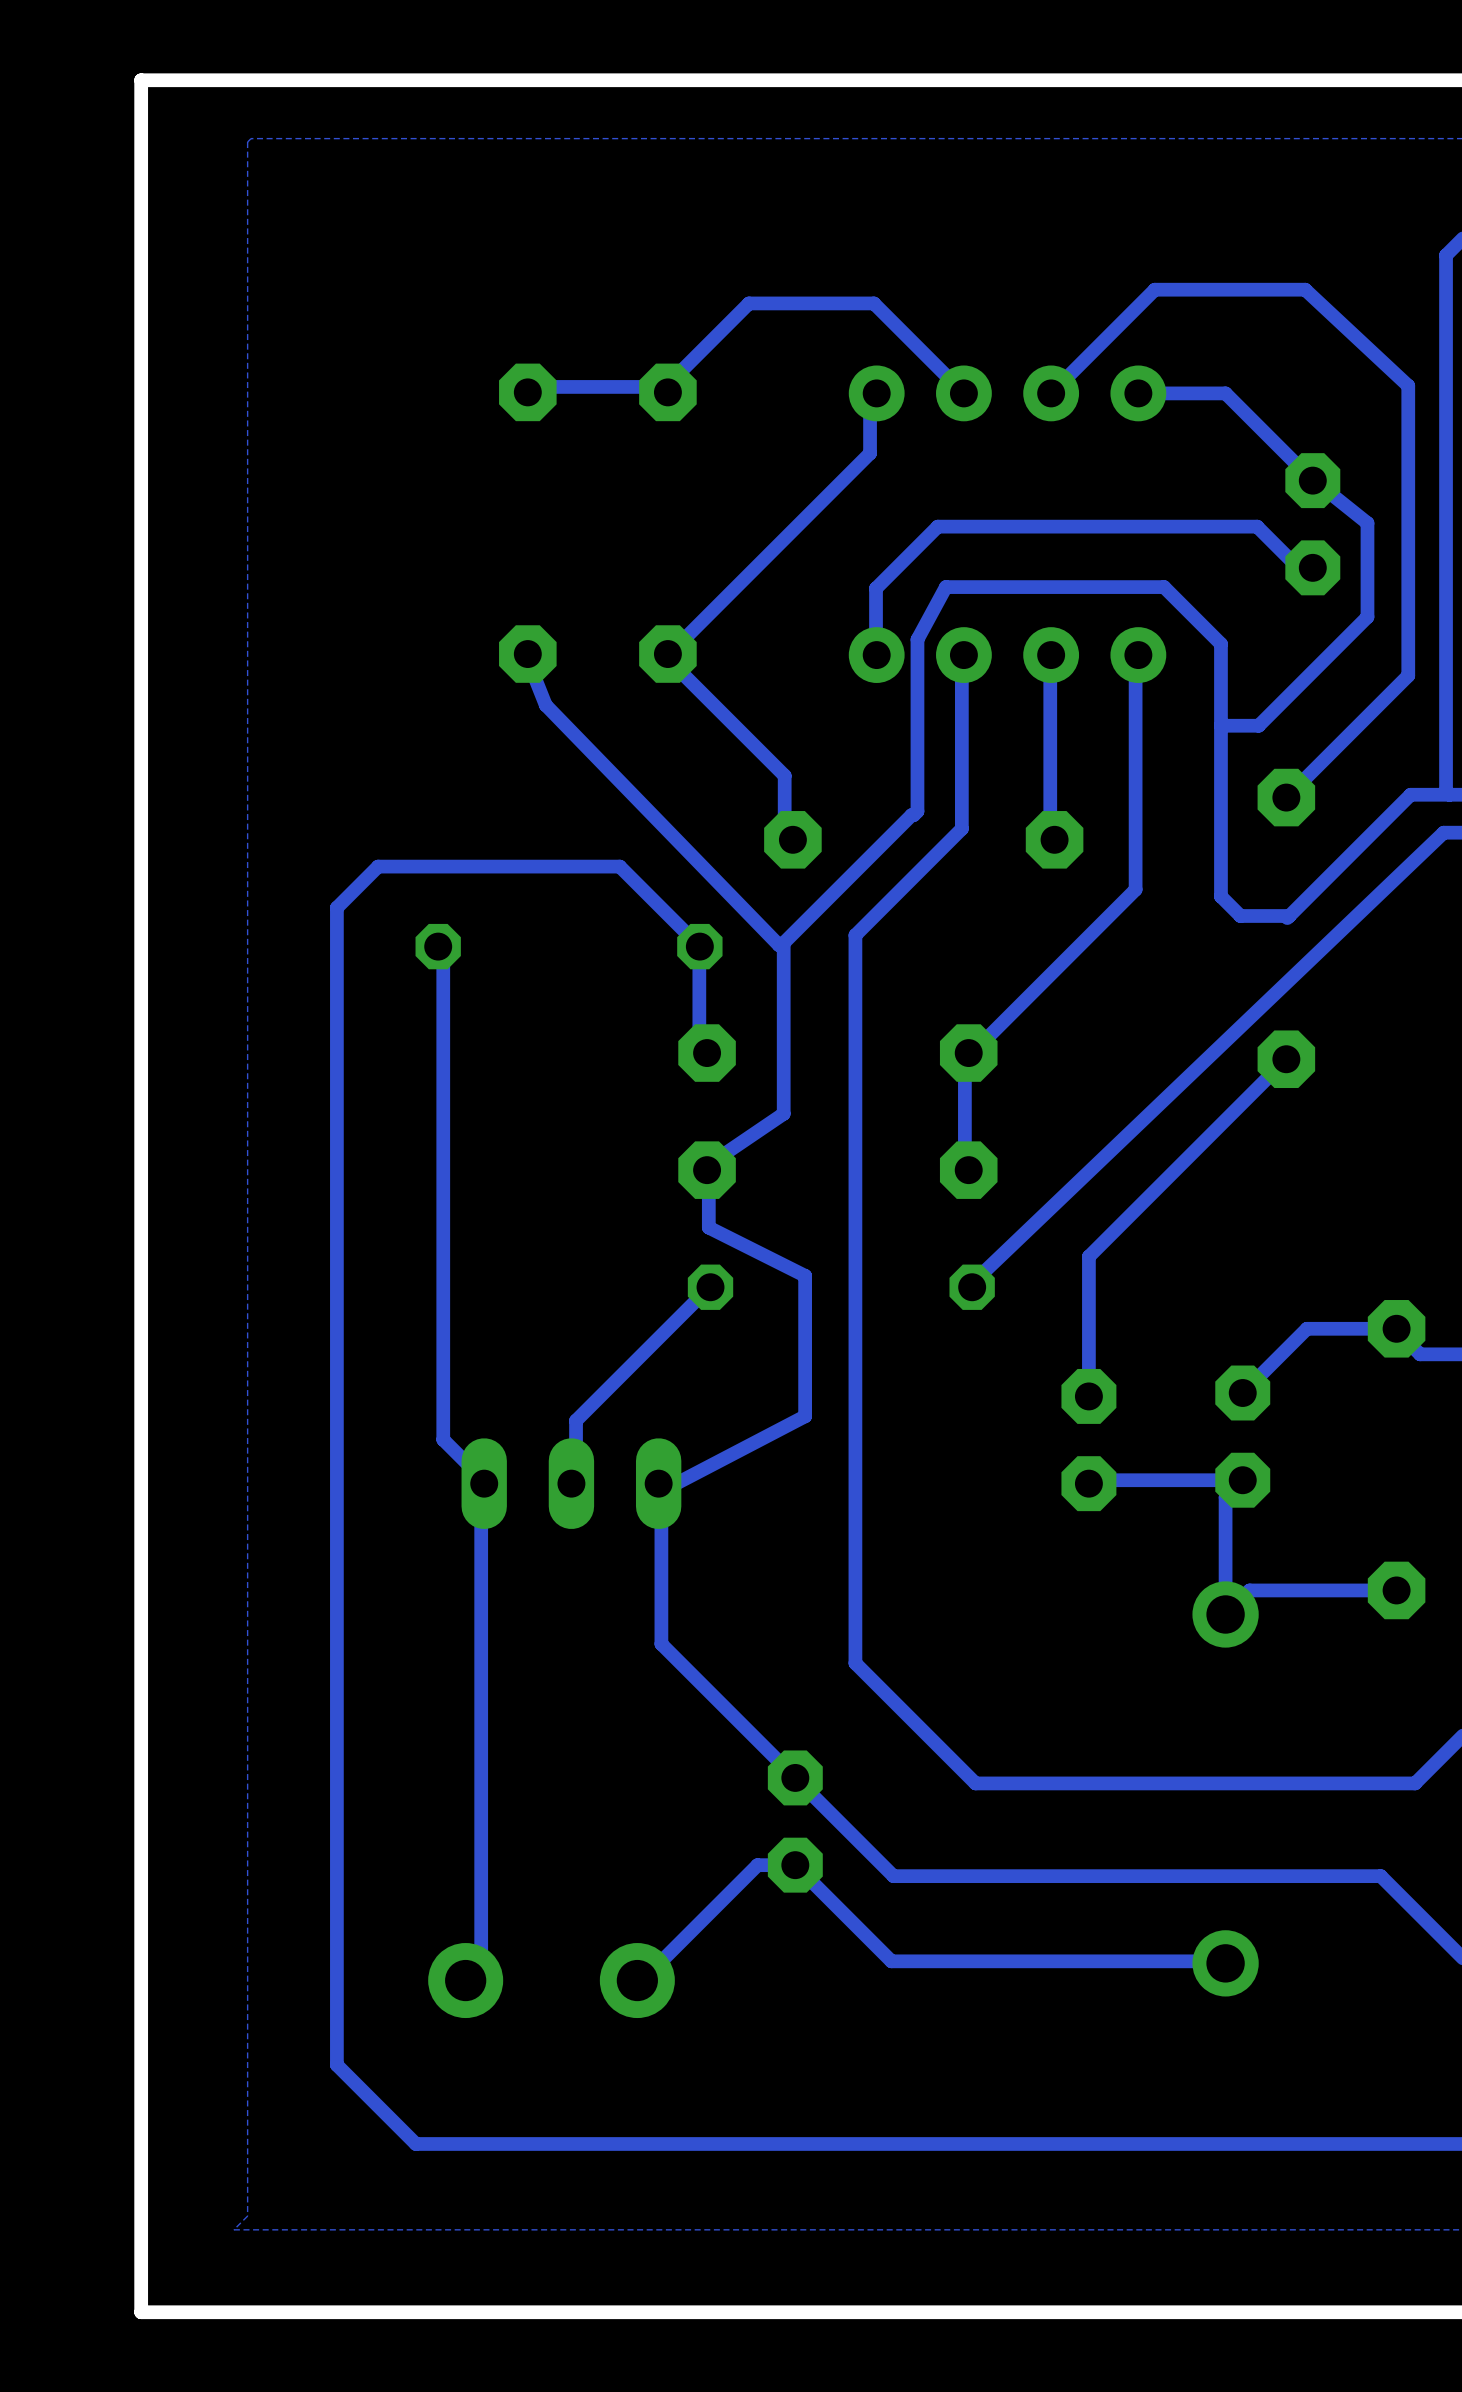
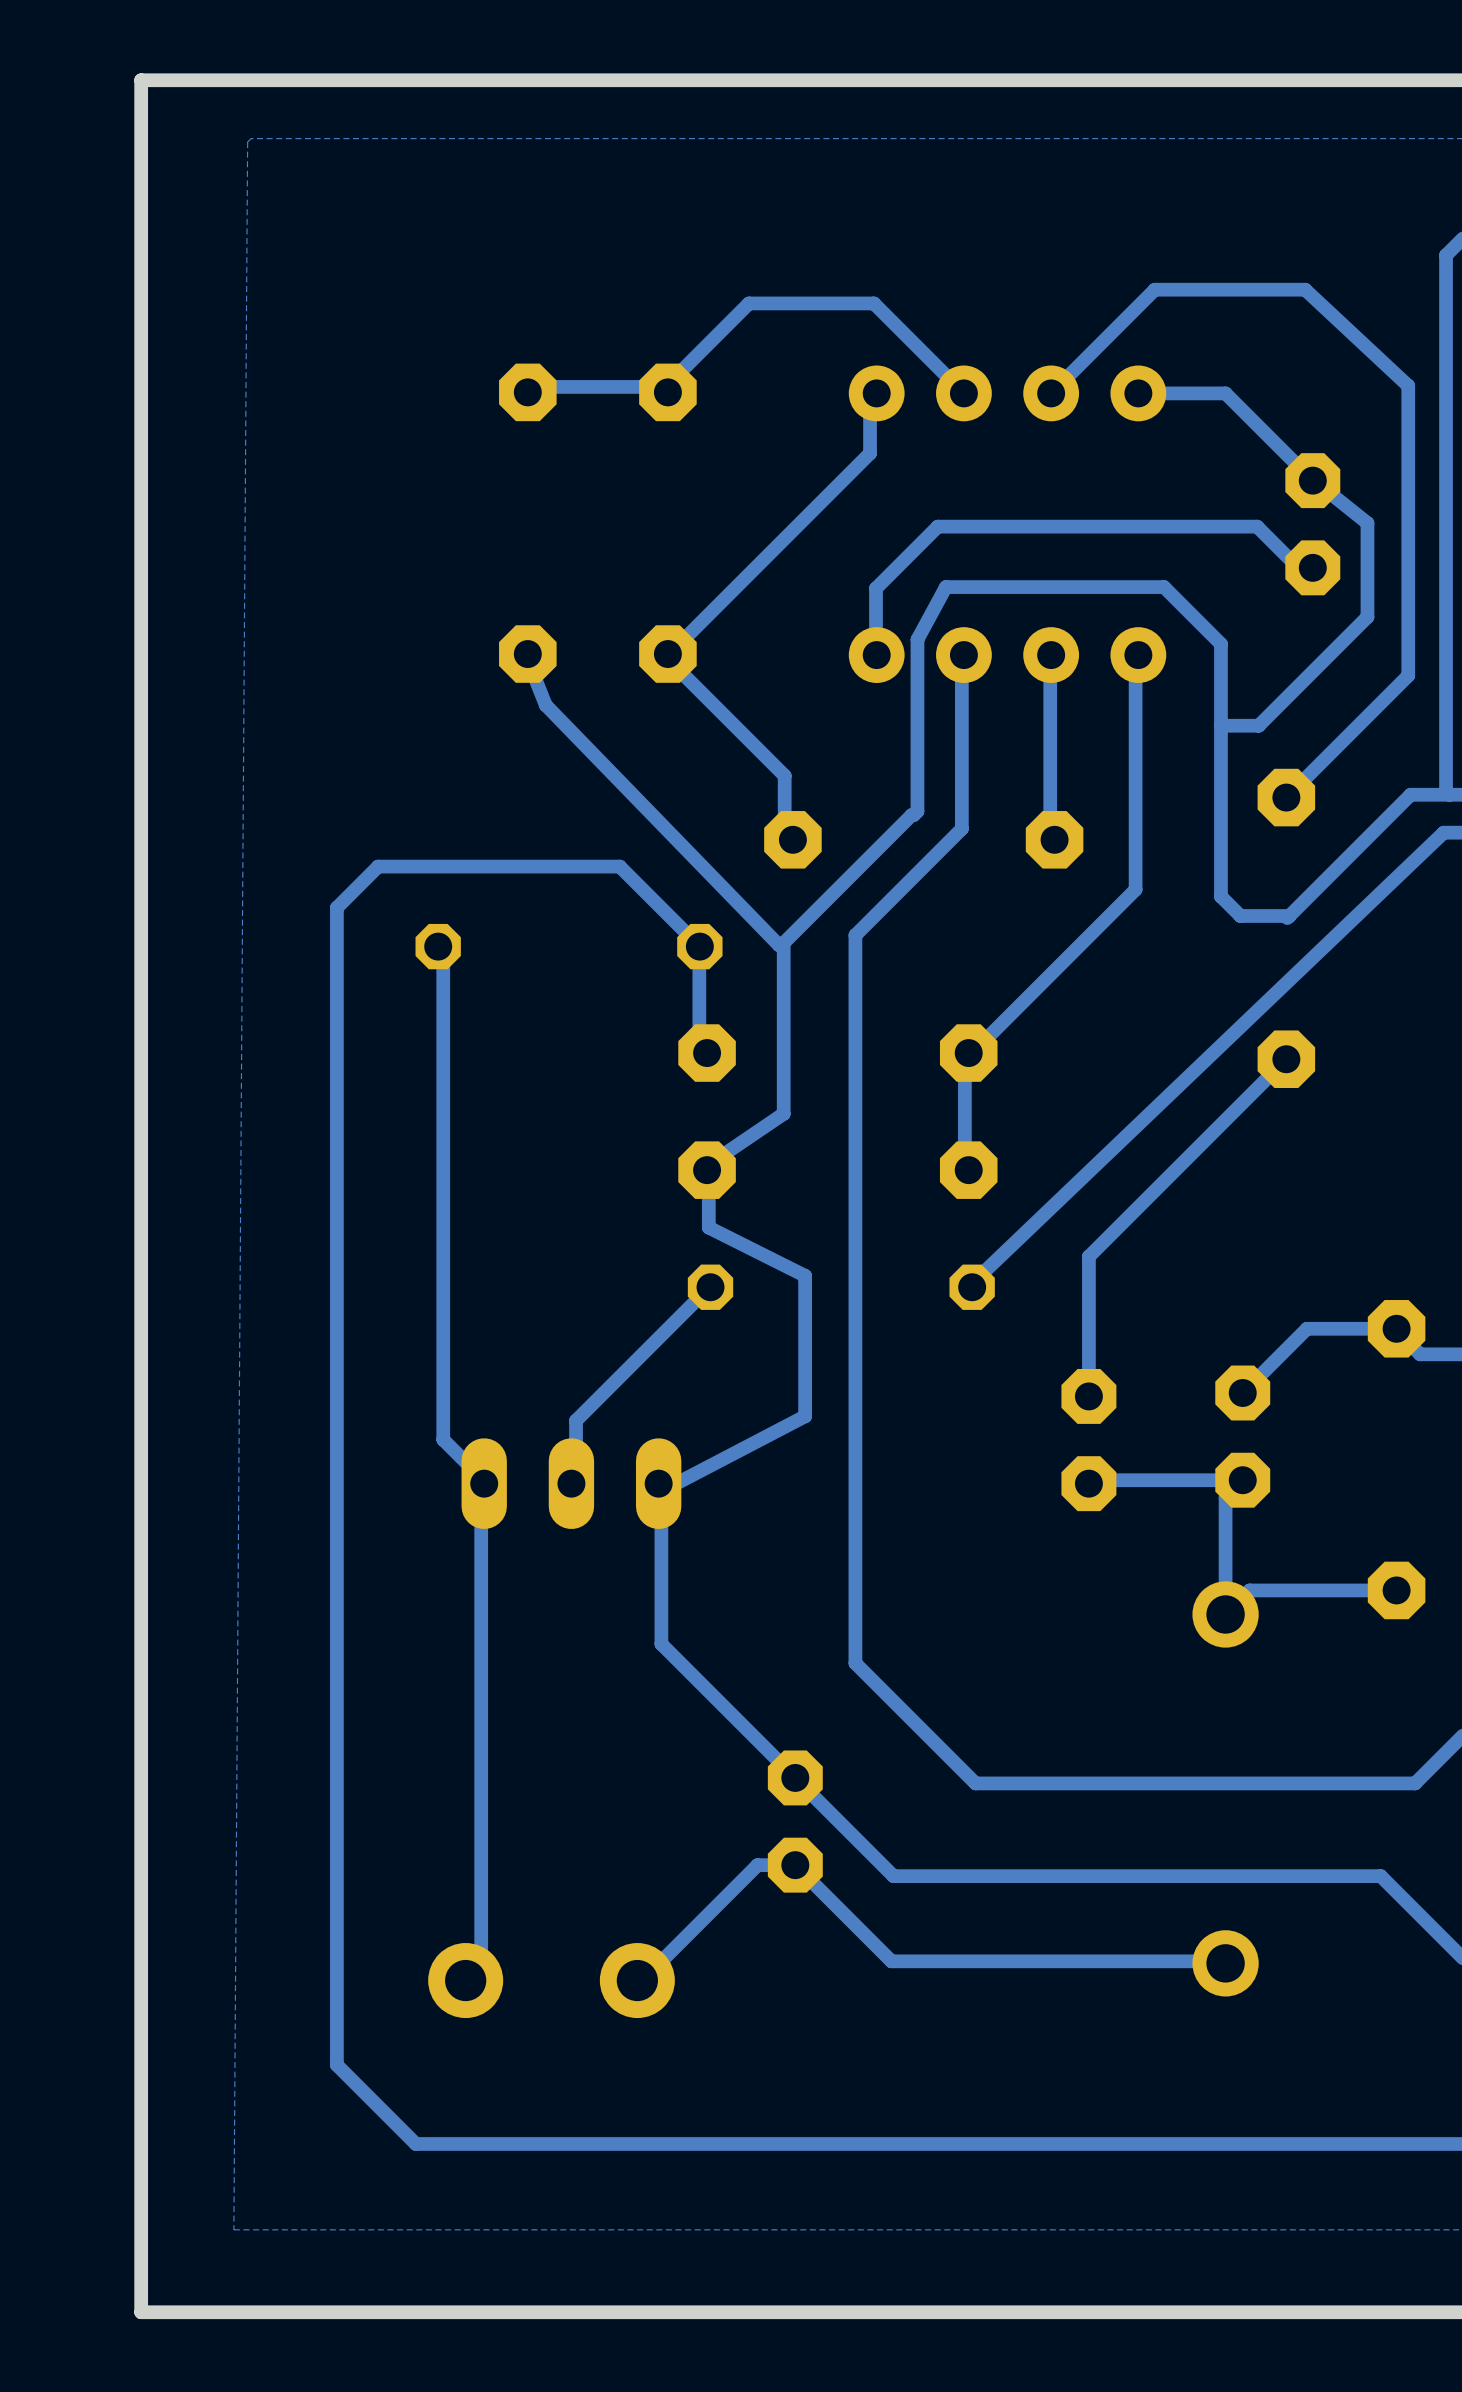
zone outline: (247, 142) (247, 2216) (233, 2229) -> (247, 142) (233, 2229)

